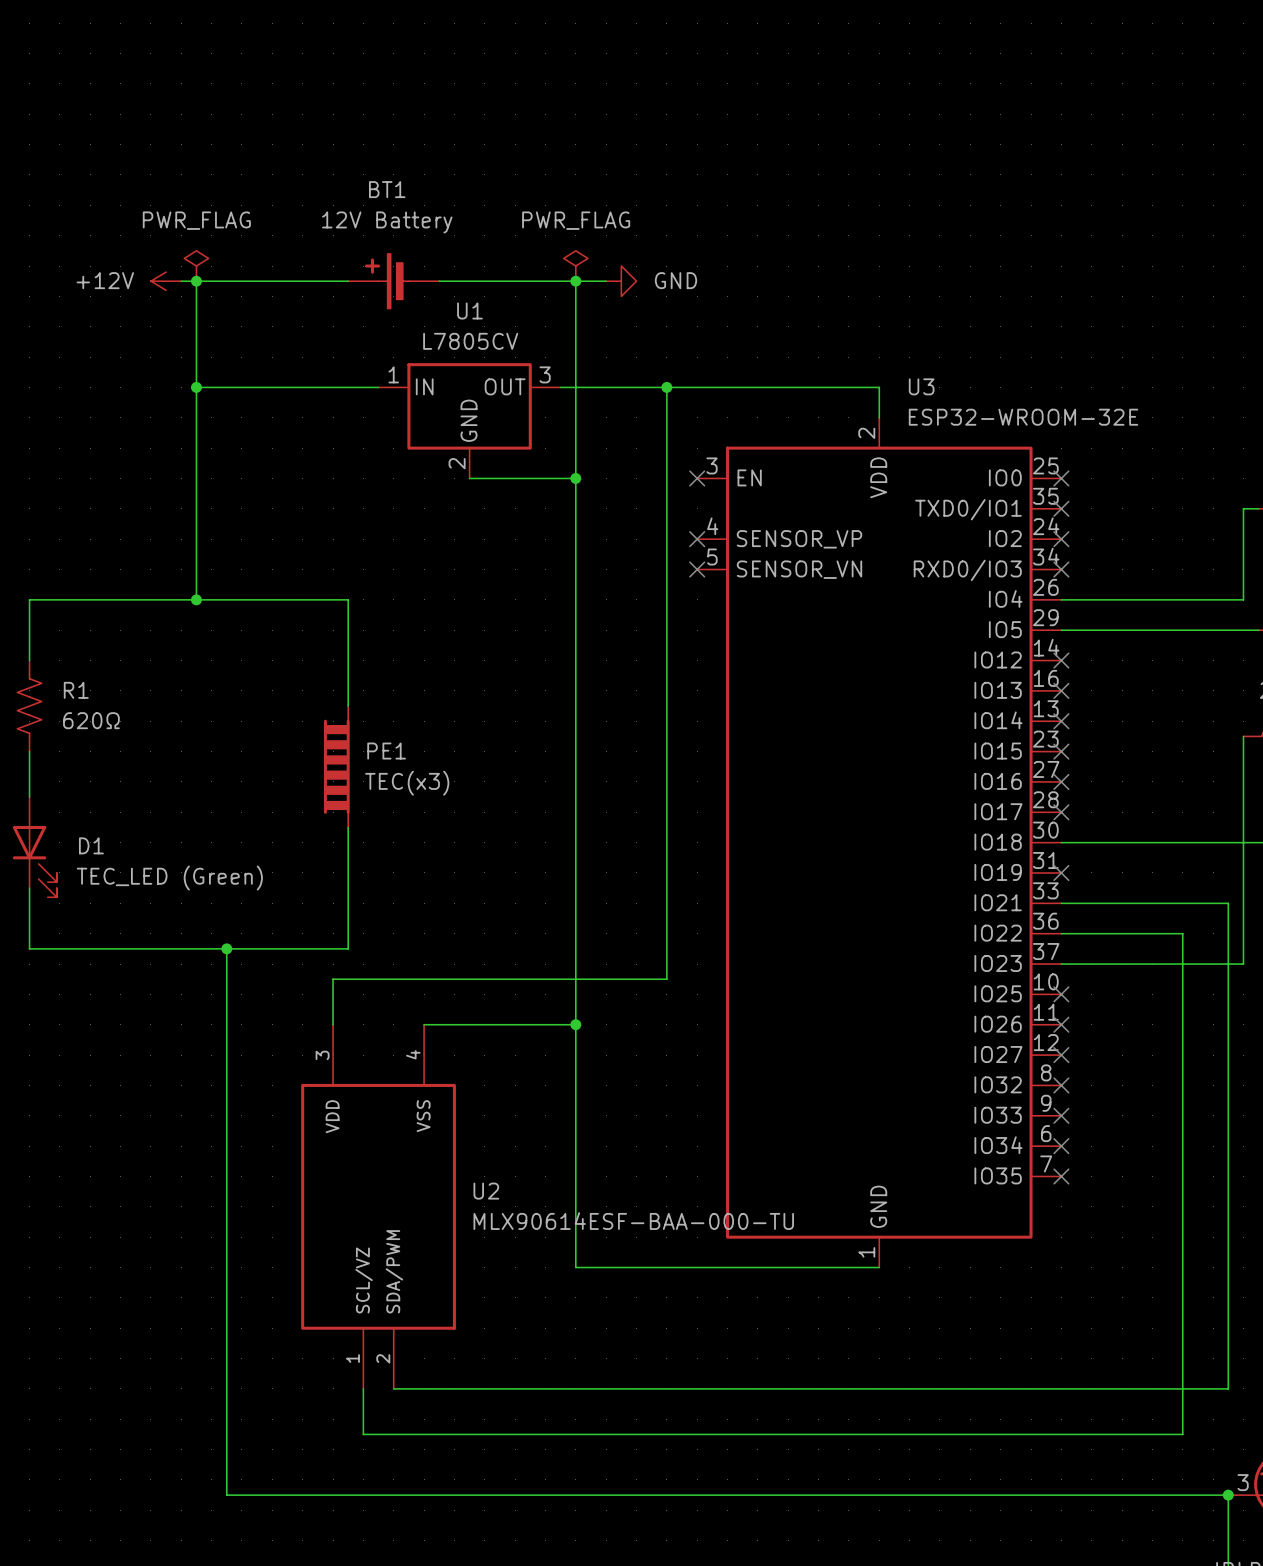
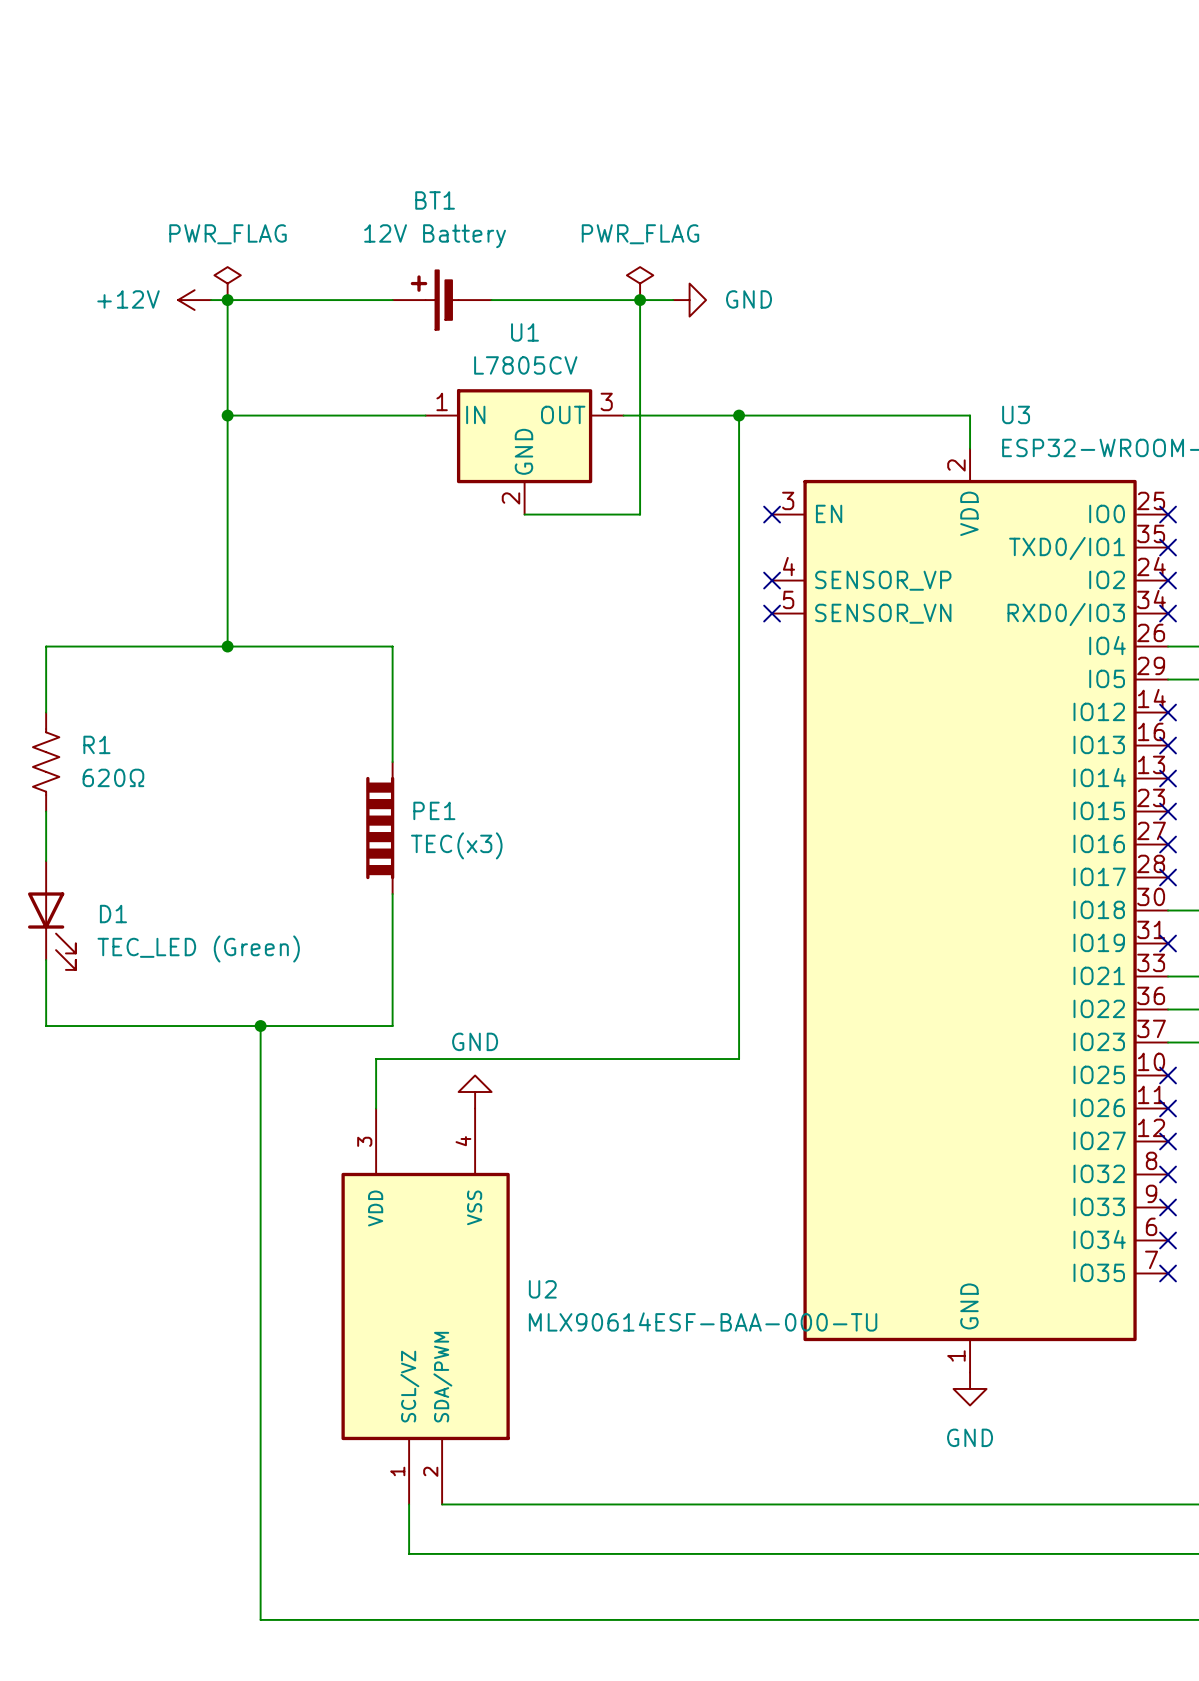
wire: (575, 478) (575, 1267) (879, 1267) -> none
junction: (575, 478) -> none
power symbol: none -> GND (475, 1092)
wire: (424, 1024) (575, 1024) -> none
junction: (575, 1024) -> none
power symbol: none -> GND (970, 1388)

